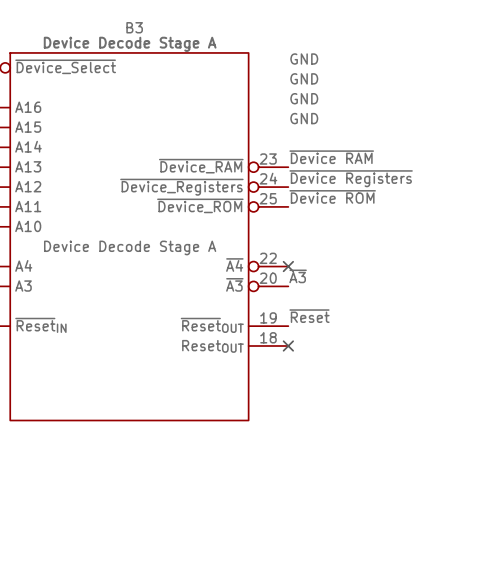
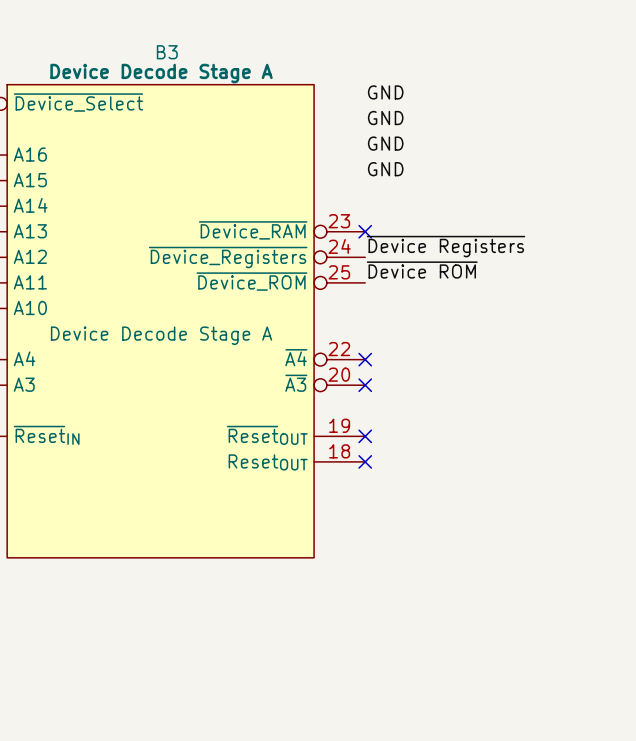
label: ~{Device RAM} (331, 157) -> none
no-connect mark: none -> (365, 231)
label: ~{A3} (298, 276) -> none
no-connect mark: none -> (365, 385)
label: ~{Reset} (309, 316) -> none
no-connect mark: none -> (365, 436)

